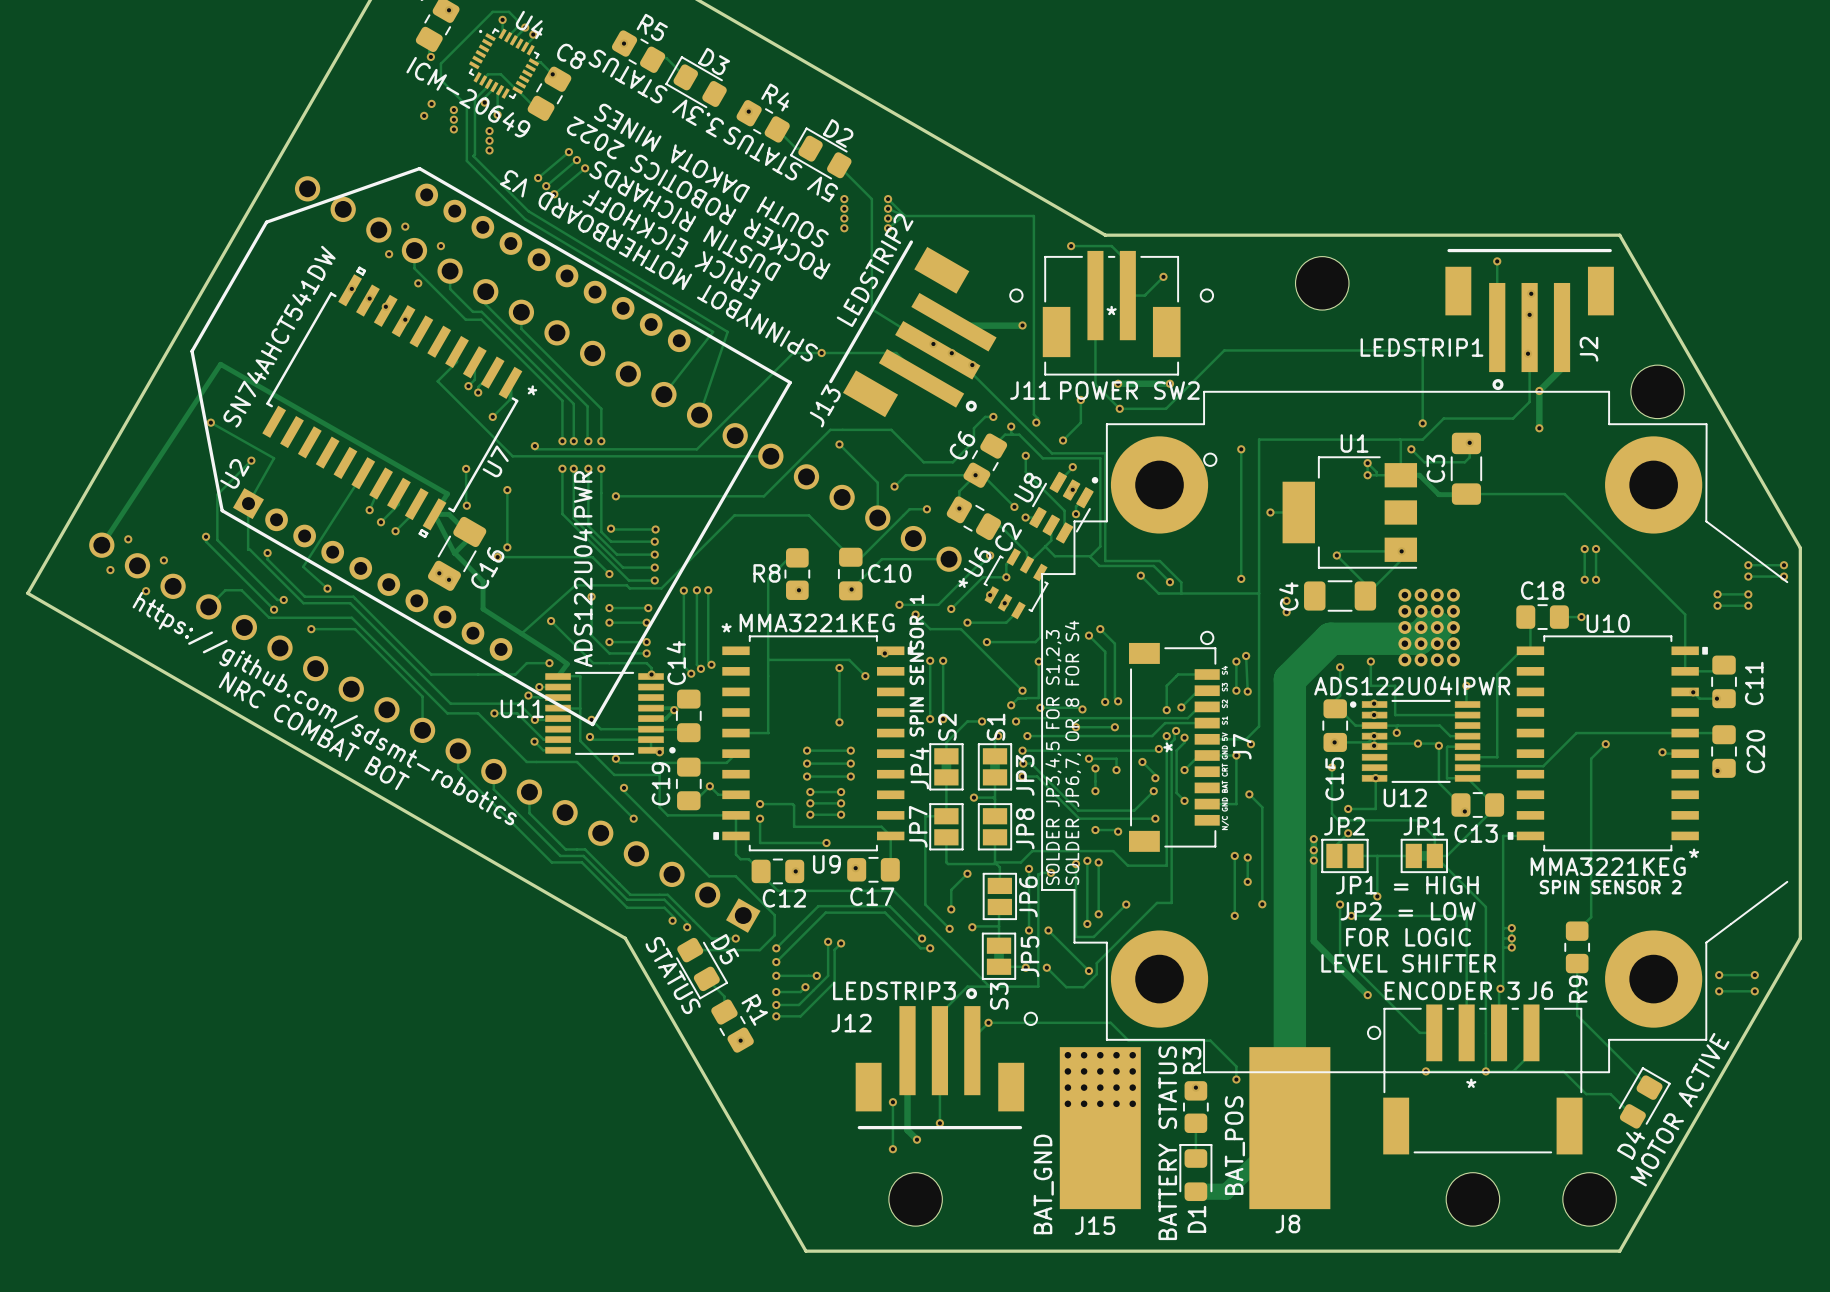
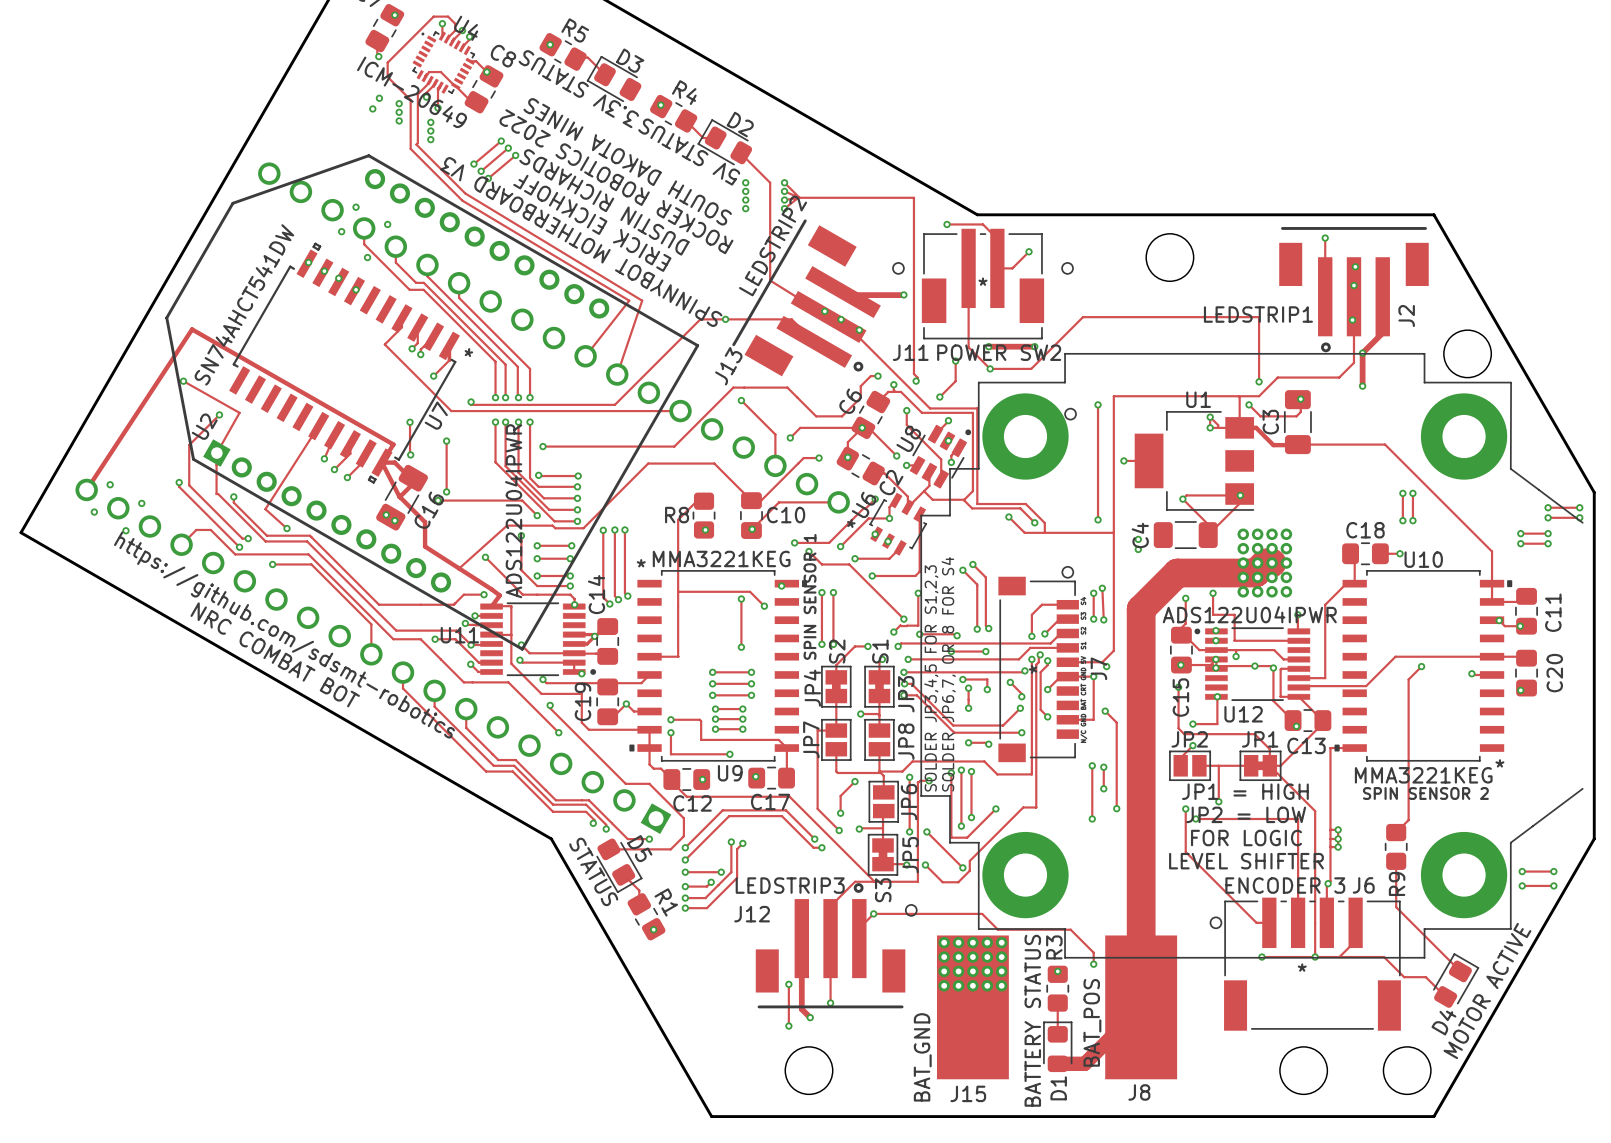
track: (1313, 839) (1313, 941) (1367, 995) -> none
via: (1313, 839) -> none
via: (1313, 850) -> none
via: (1313, 860) -> none
via: (1367, 995) -> none

